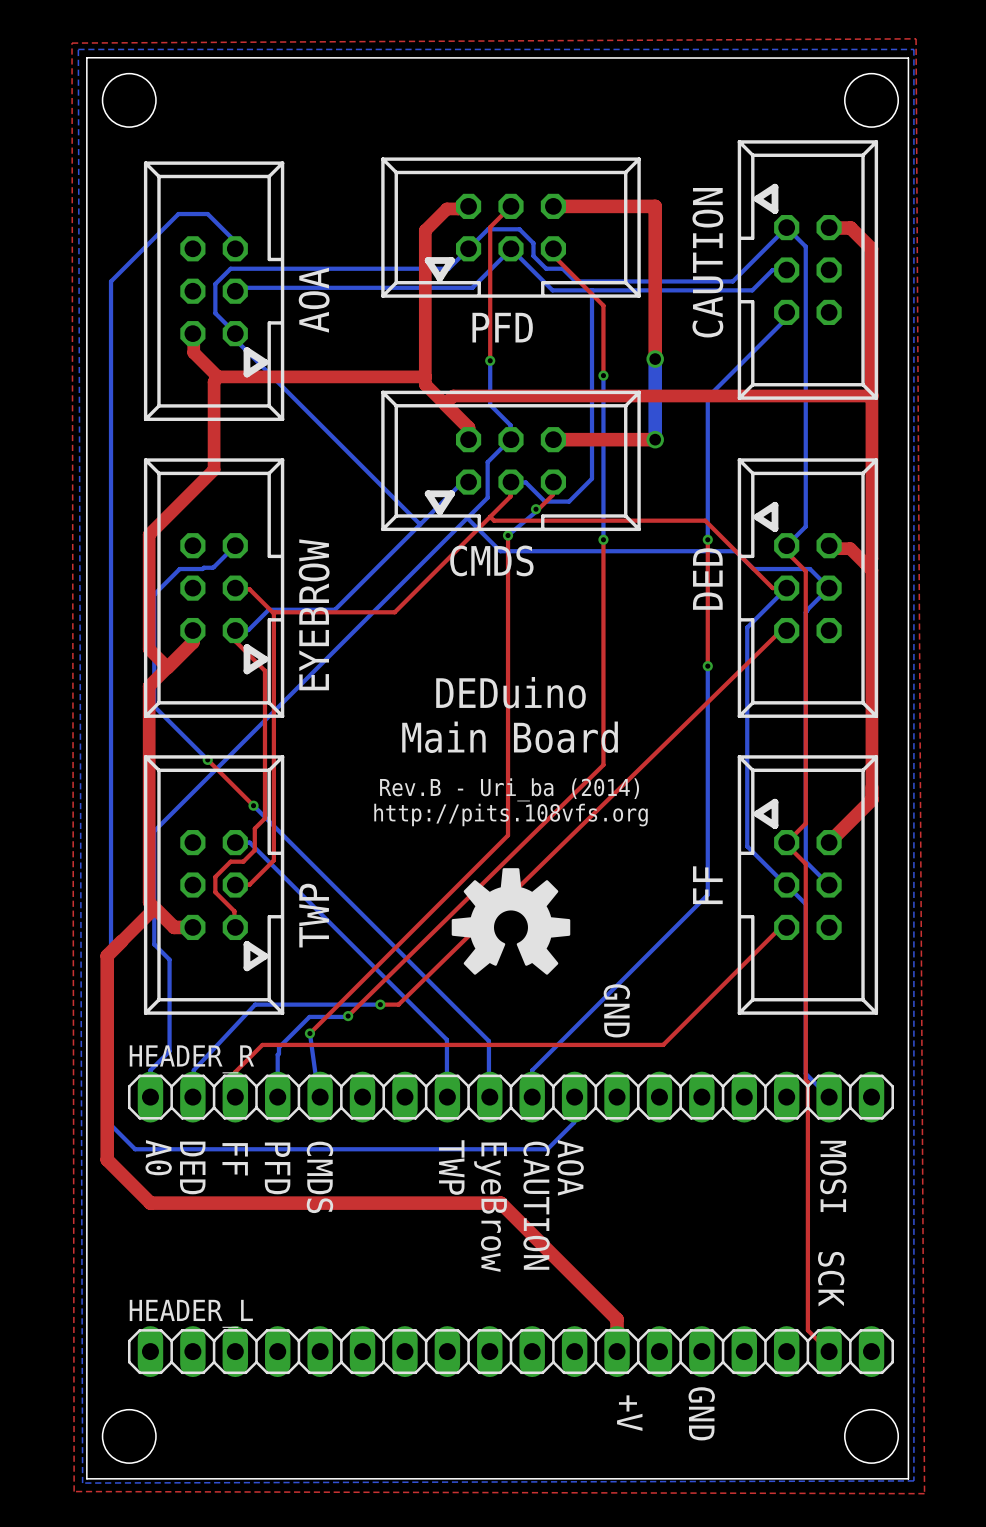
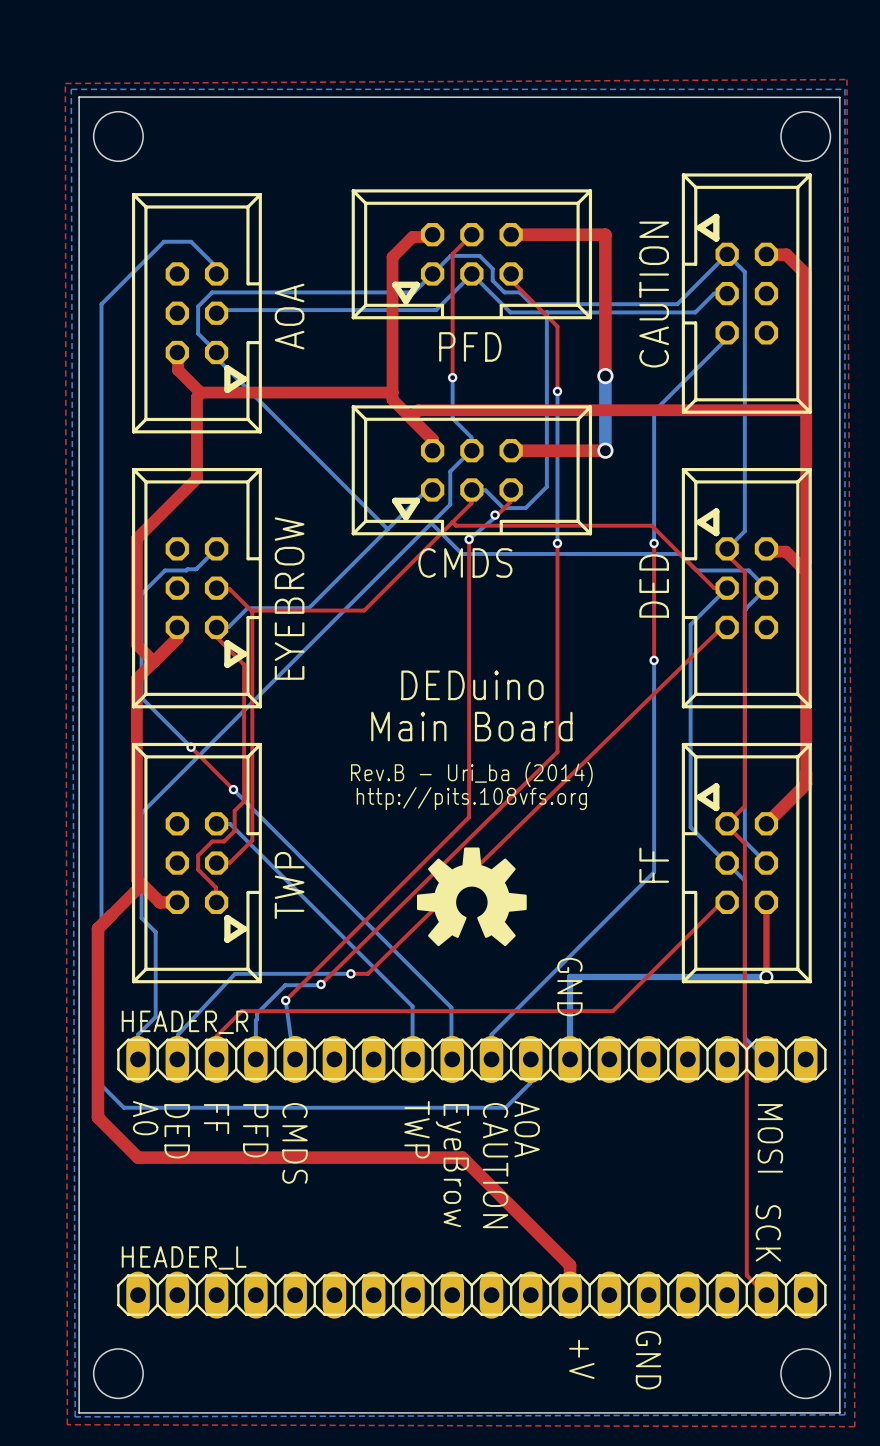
top track: none -> (766, 902) (766, 976)
bottom track: none -> (766, 976) (570, 976) (570, 1059)
via: none -> (766, 976)

